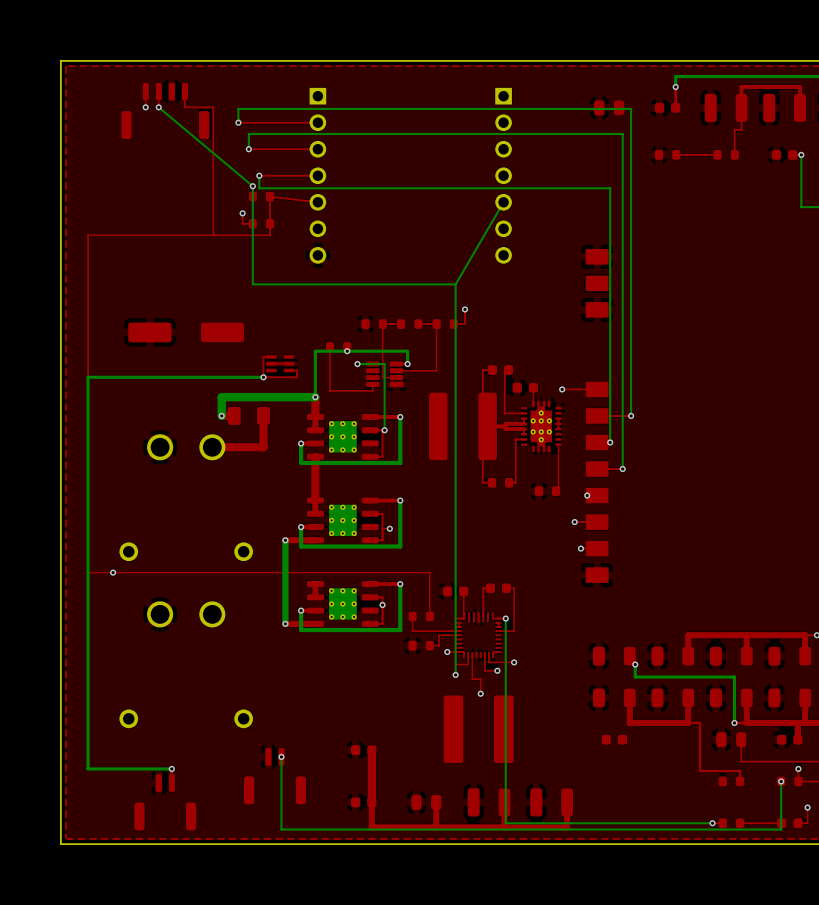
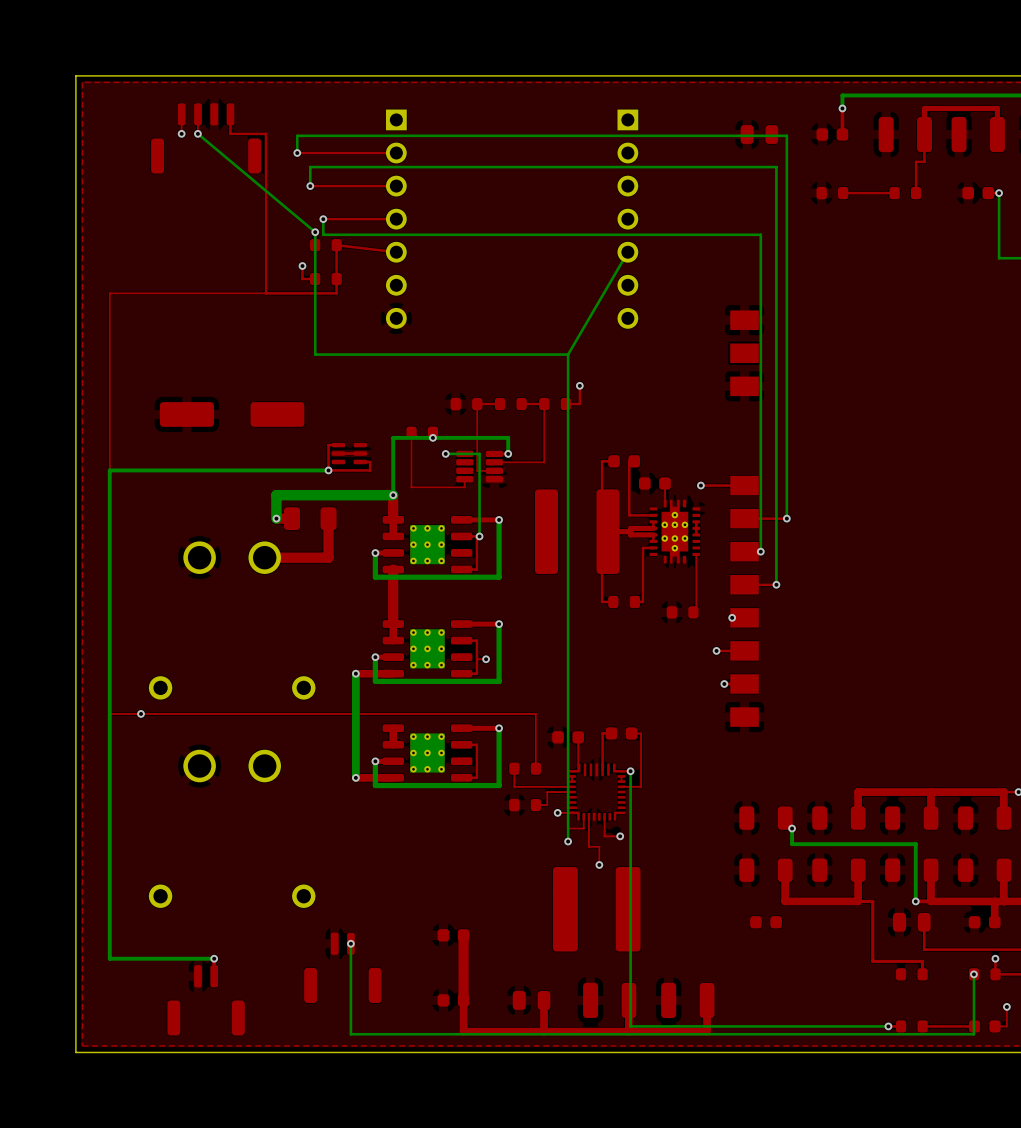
via: (382, 604) -> none
top track: (489, 655) (489, 662) (514, 662) -> none
via: (514, 662) -> none

